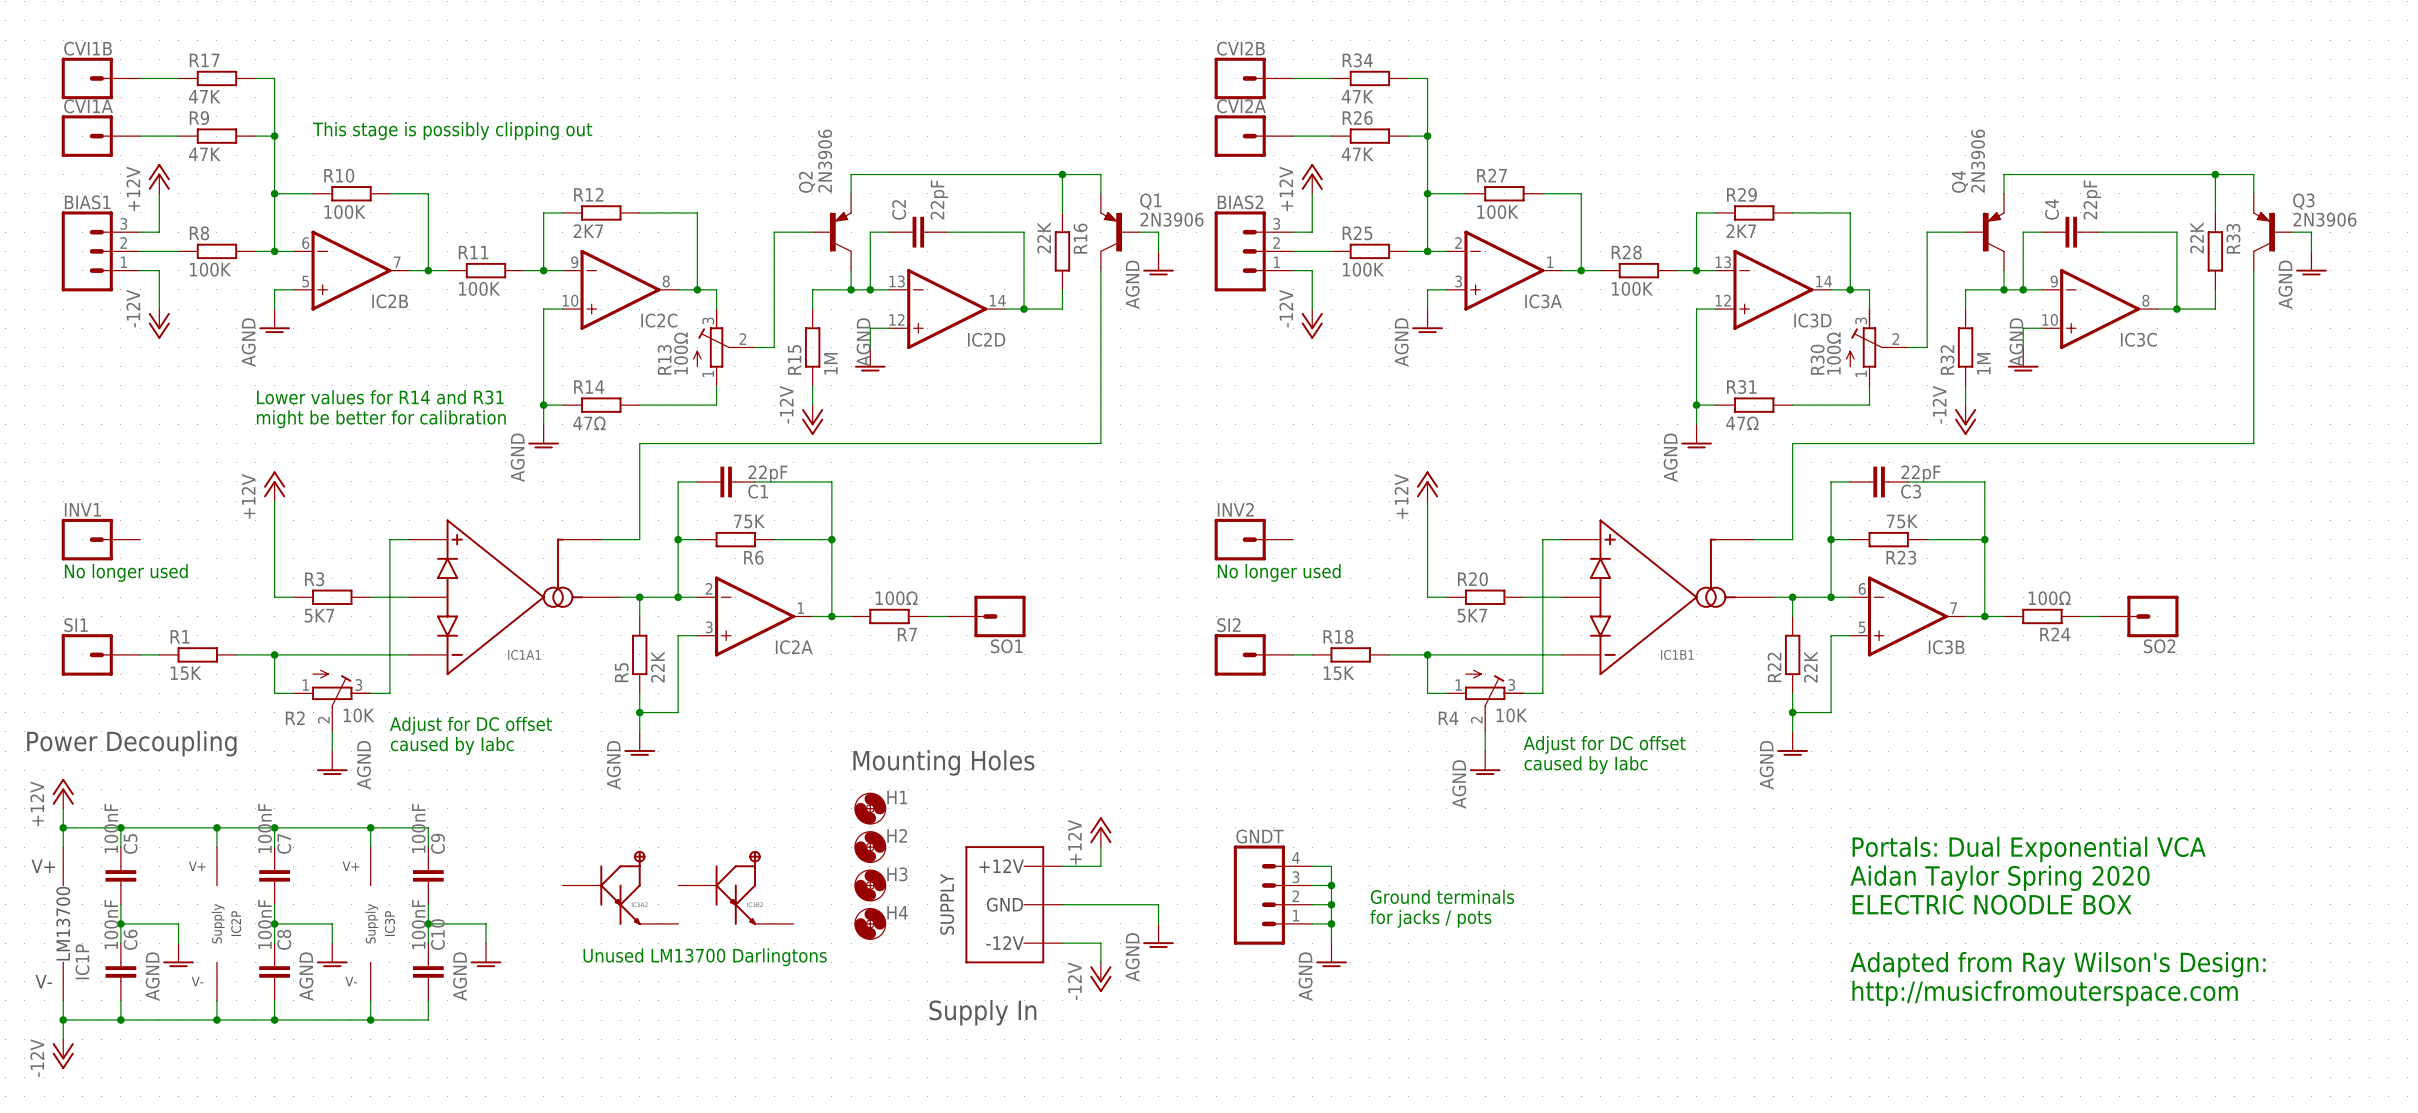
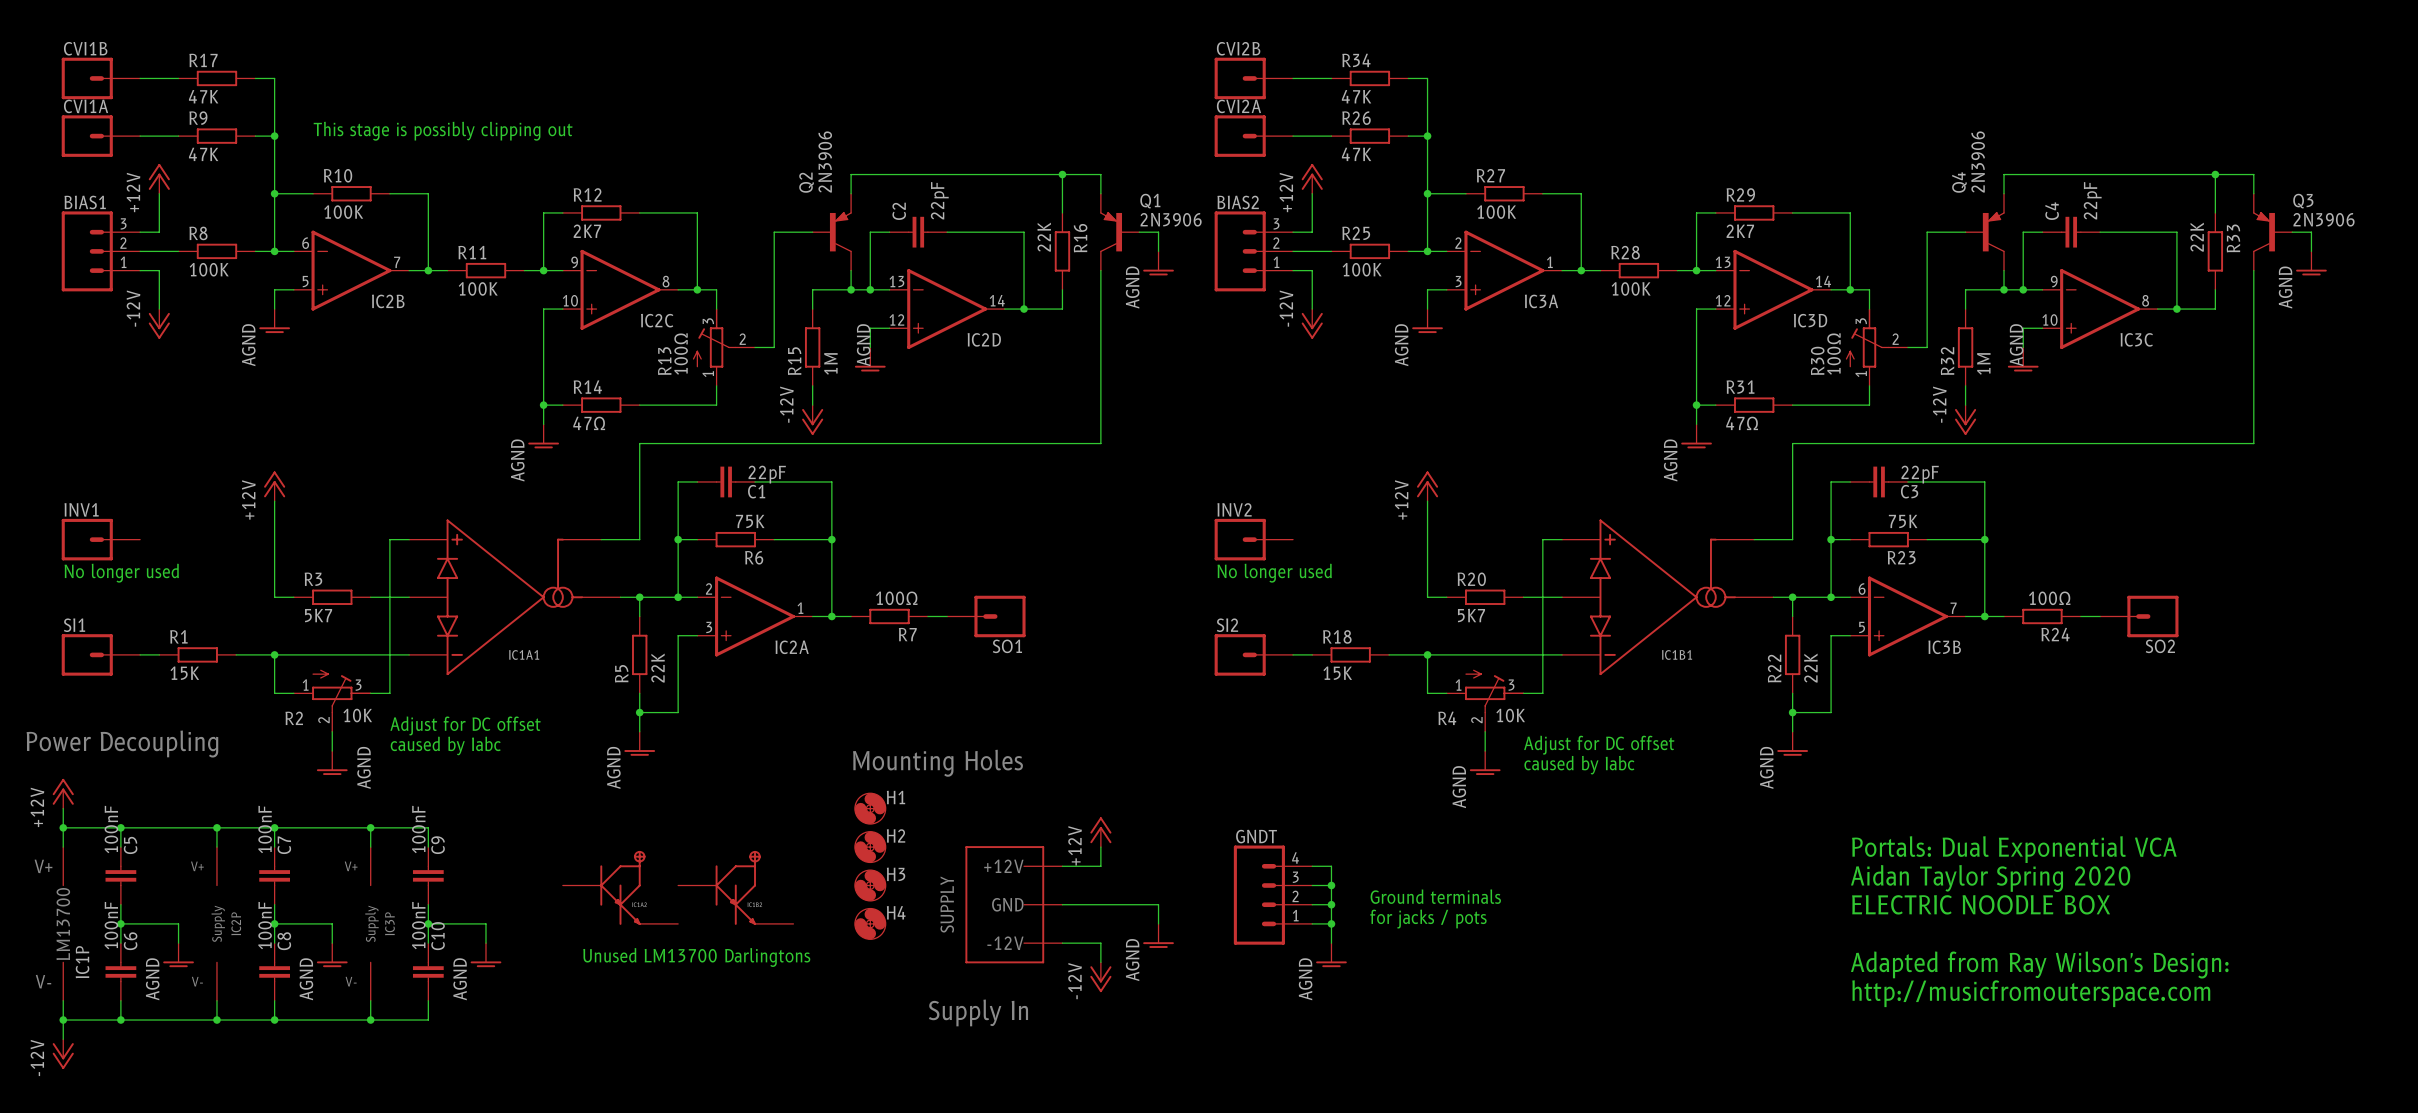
text: Lower values for R14 and R31 (380, 397) -> none
text: might be better for calibration (381, 419) -> none

